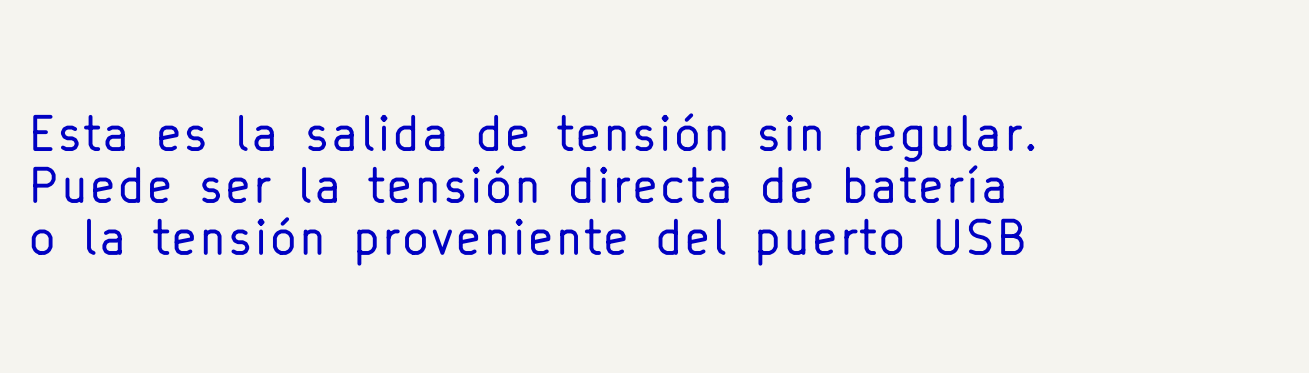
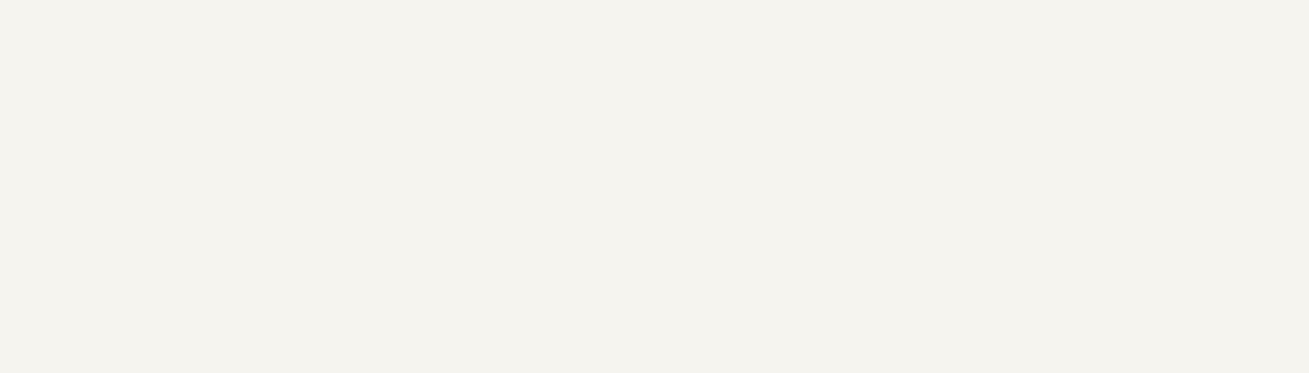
text: Esta es la salida de tensión sin regular. (533, 137) -> none
text: Puede ser la tensión directa de batería (518, 184) -> none
text: o la tensión proveniente del puerto USB (527, 241) -> none

